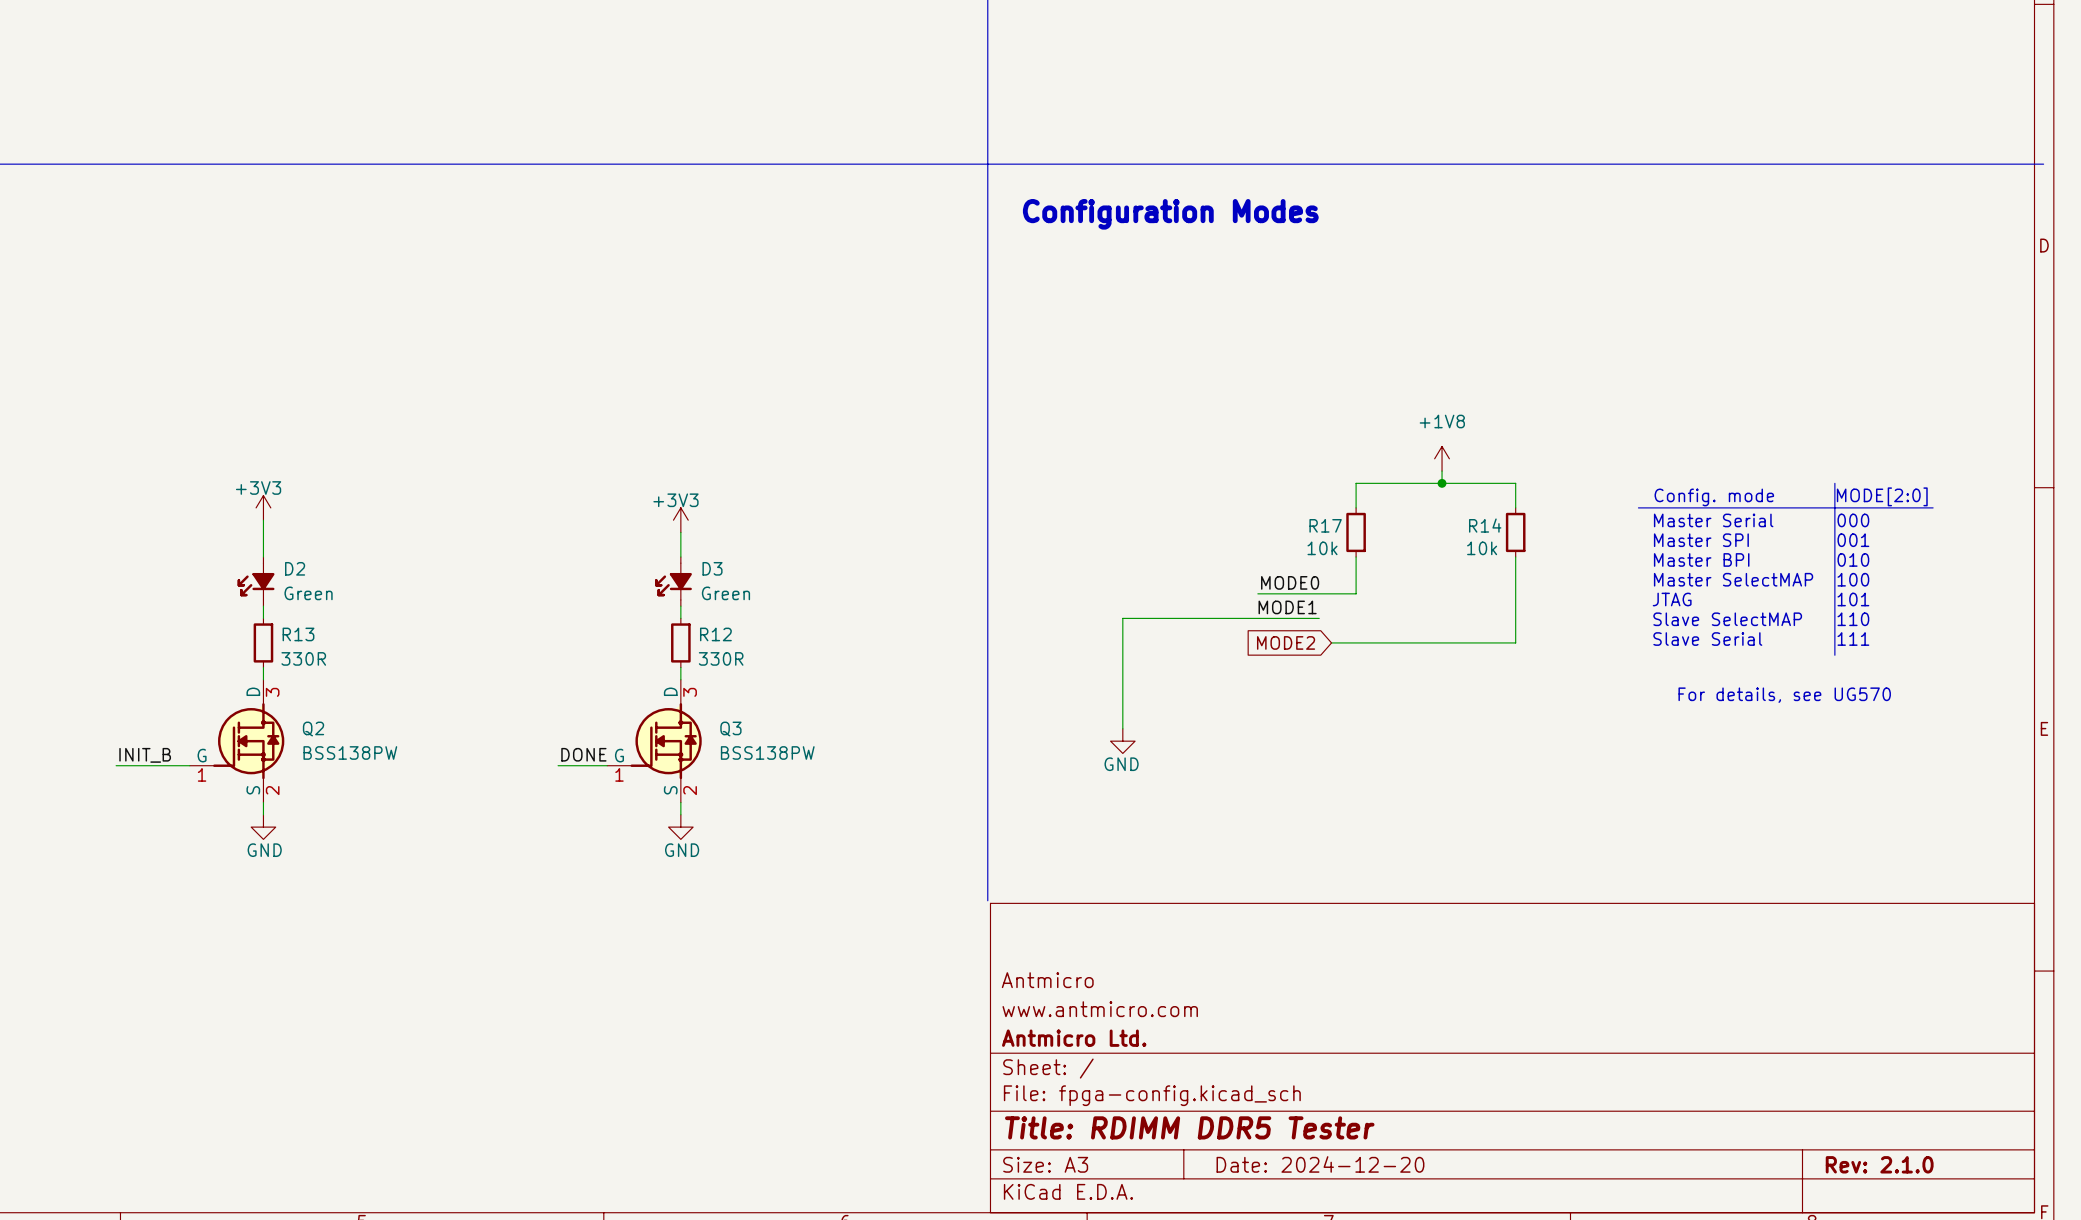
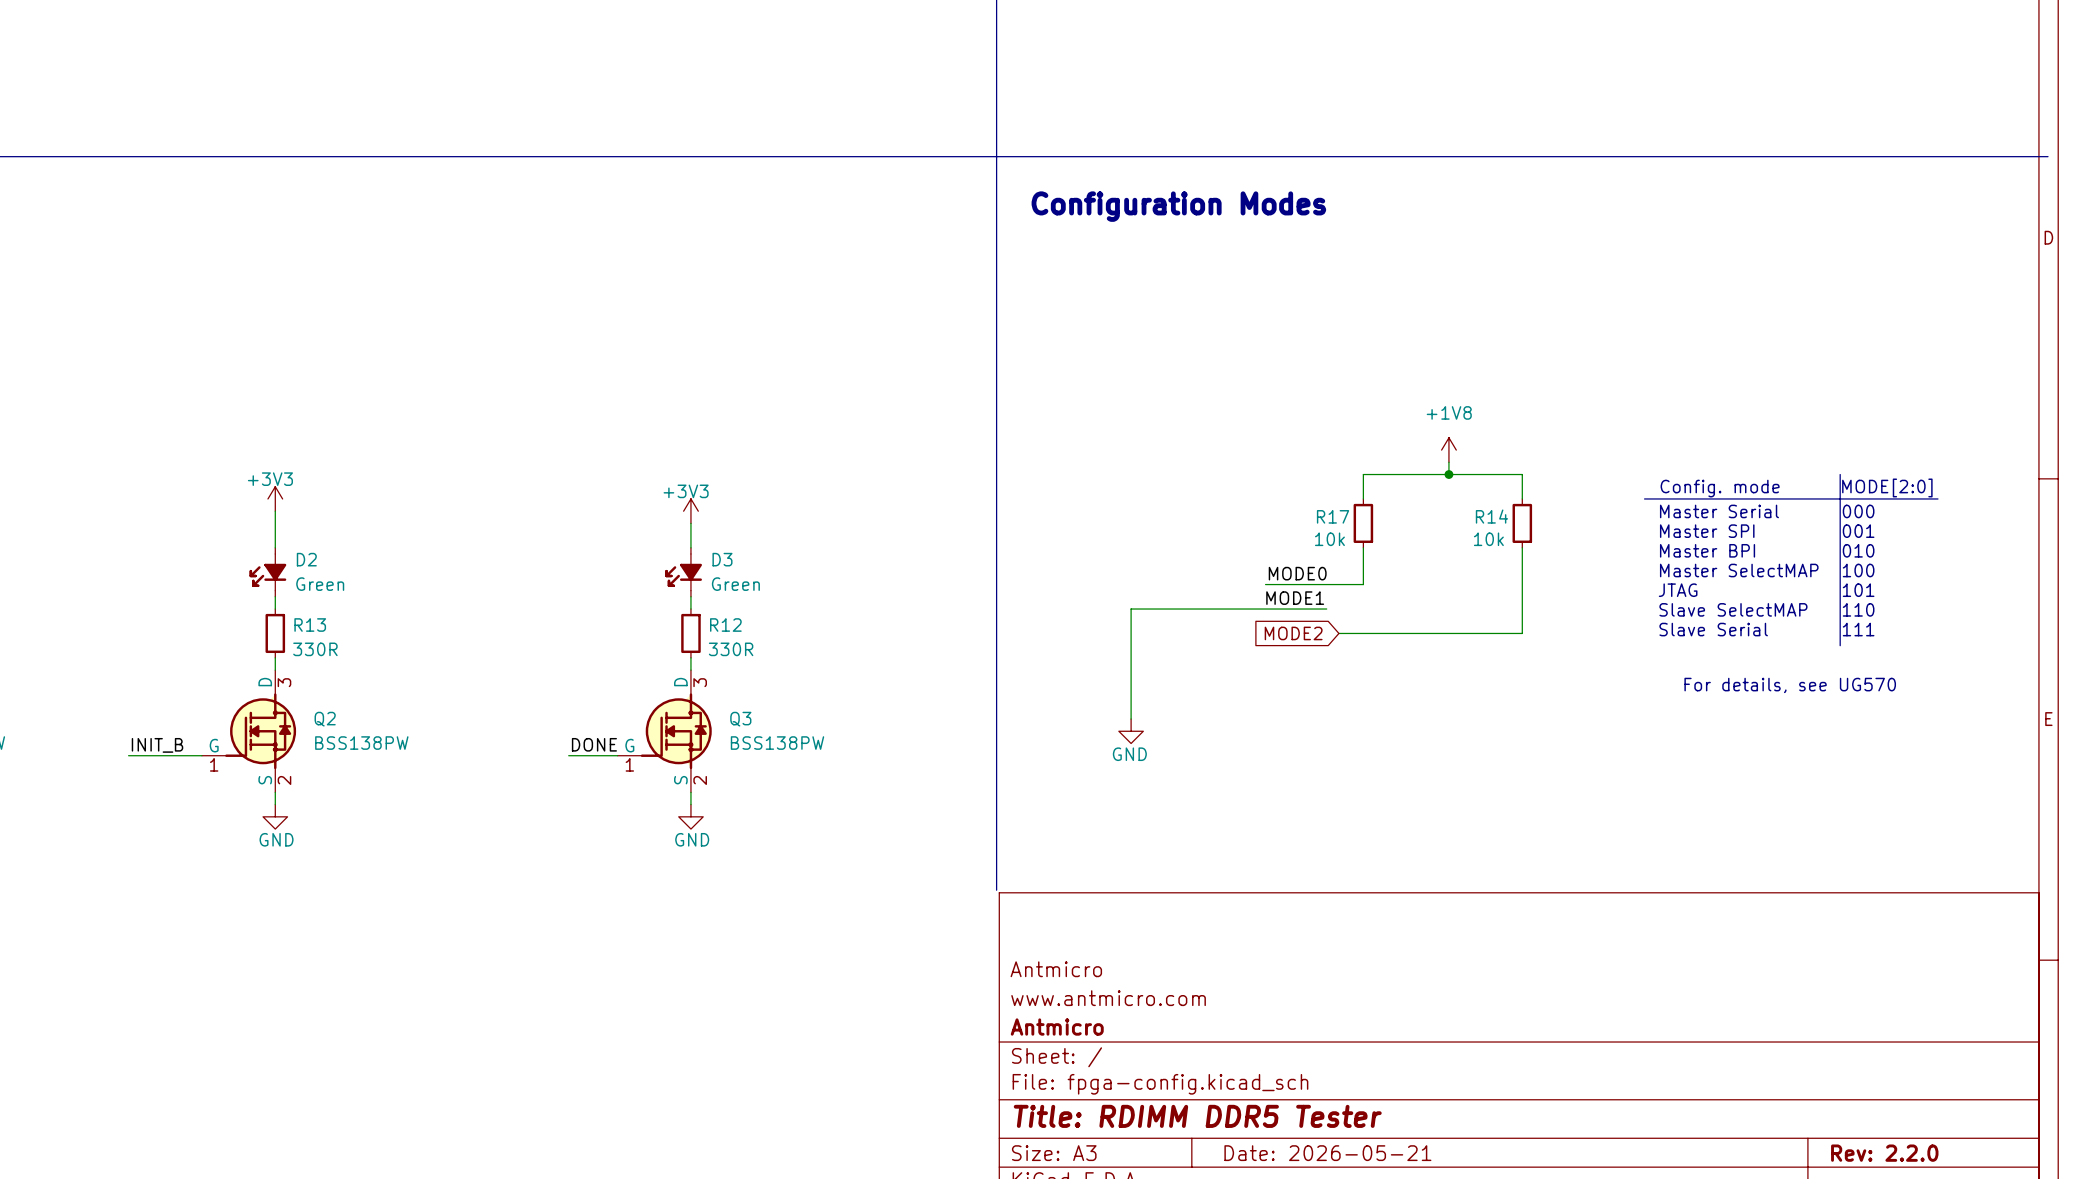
title block: Antmicro Ltd. (1074, 1038) -> Antmicro (1057, 1027)
title block: Date: 2024-12-20 (1320, 1164) -> Date: 2026-05-21 (1327, 1153)
title block: Rev: 2.1.0 (1879, 1164) -> Rev: 2.2.0 (1884, 1153)

